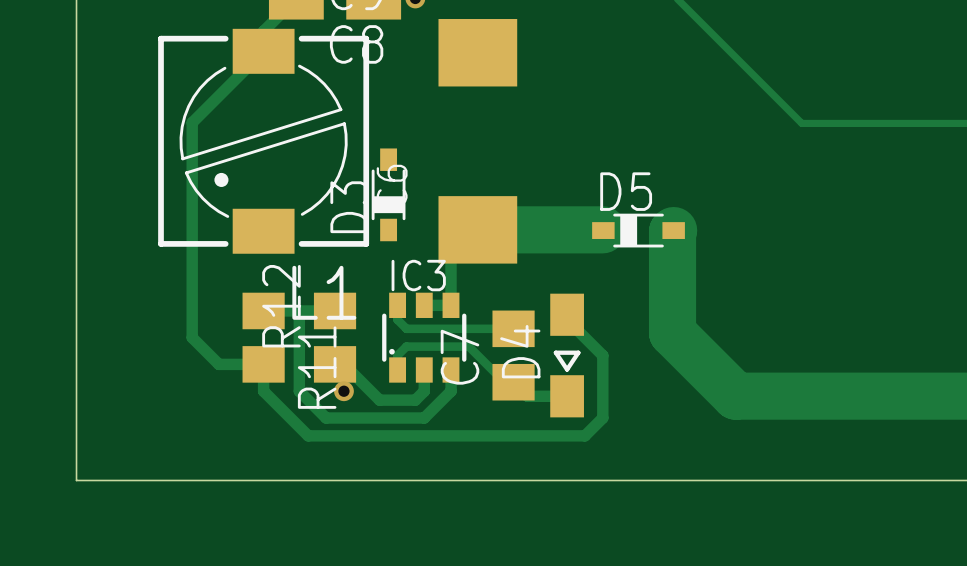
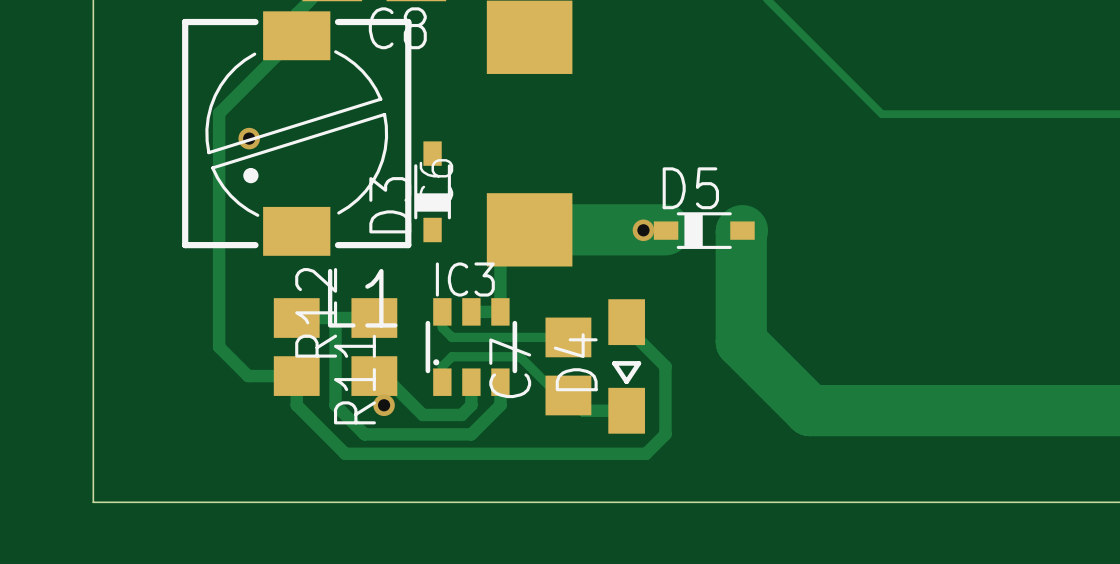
via: none -> (249, 138)
via: none -> (643, 230)

